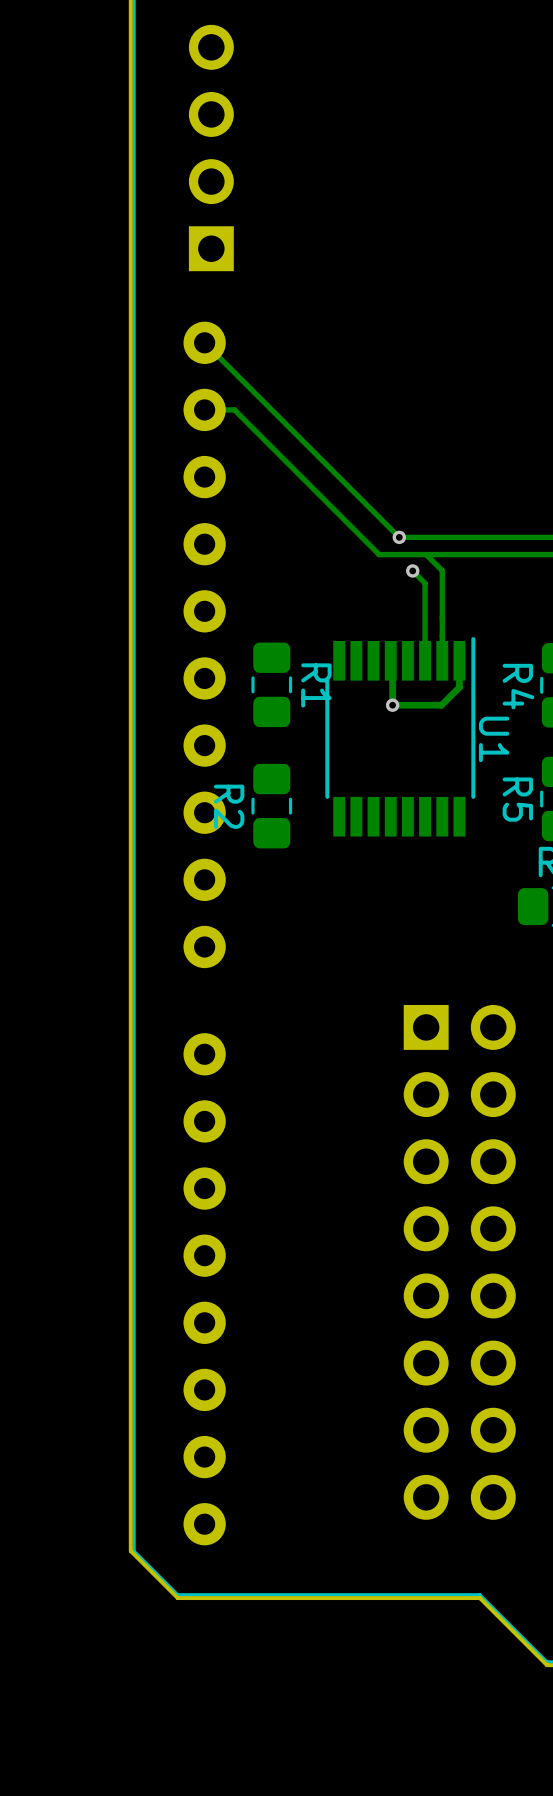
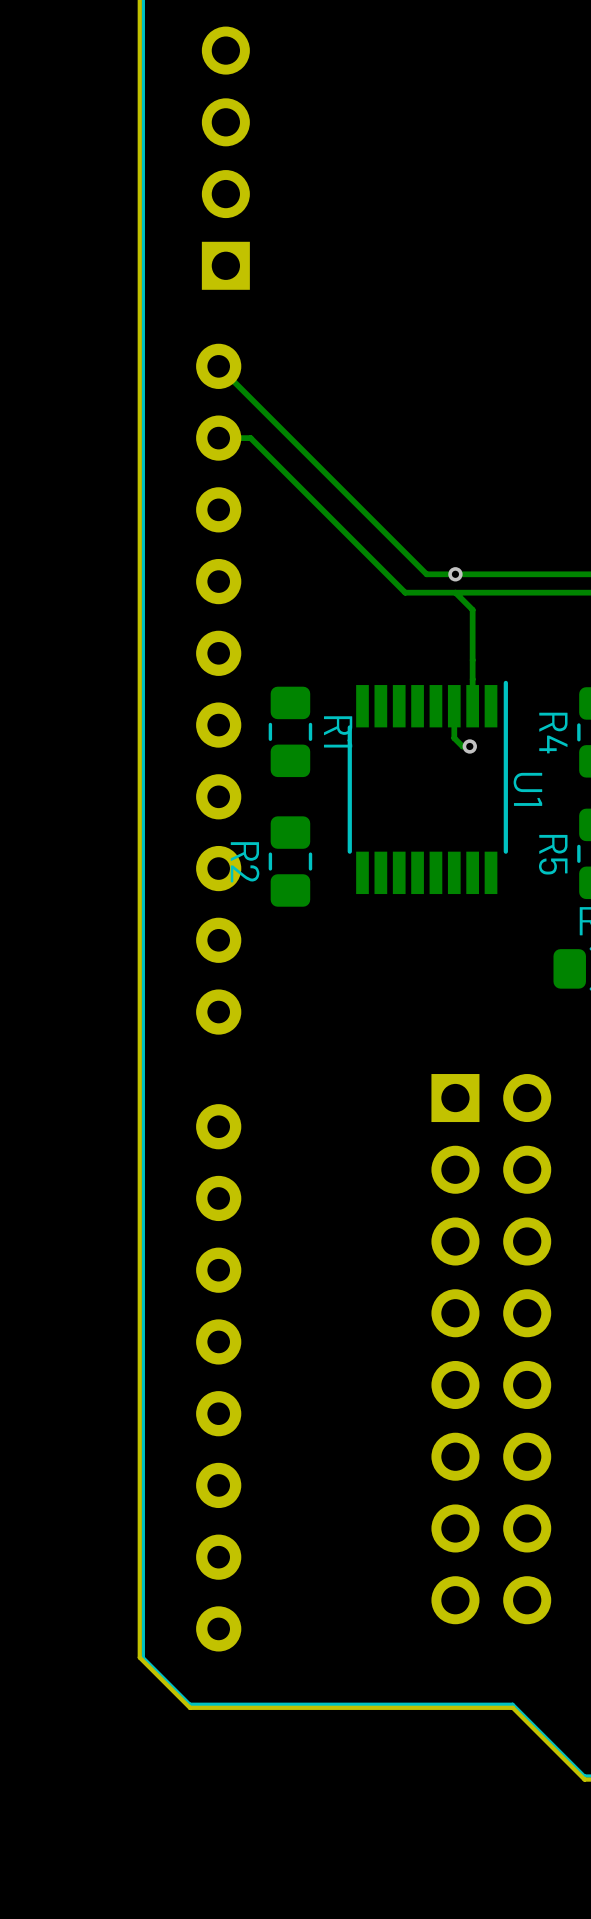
via: (399, 537) -> none
via: none -> (455, 574)
track: (412, 570) (425, 583) (425, 660) -> (469, 746) (462, 746) (454, 738) (454, 706)
via: (412, 570) -> none
track: (459, 660) (459, 687) (441, 705) (392, 705) (392, 662) (390, 660) -> none
via position: (392, 705) -> (469, 746)

